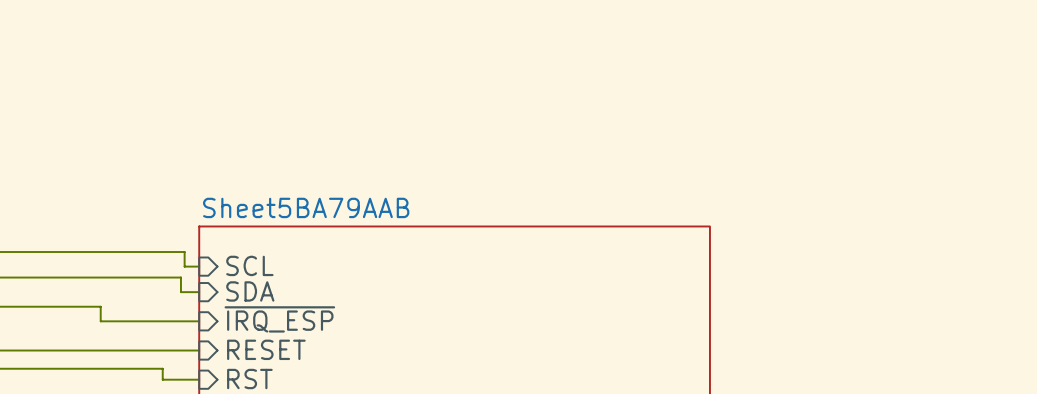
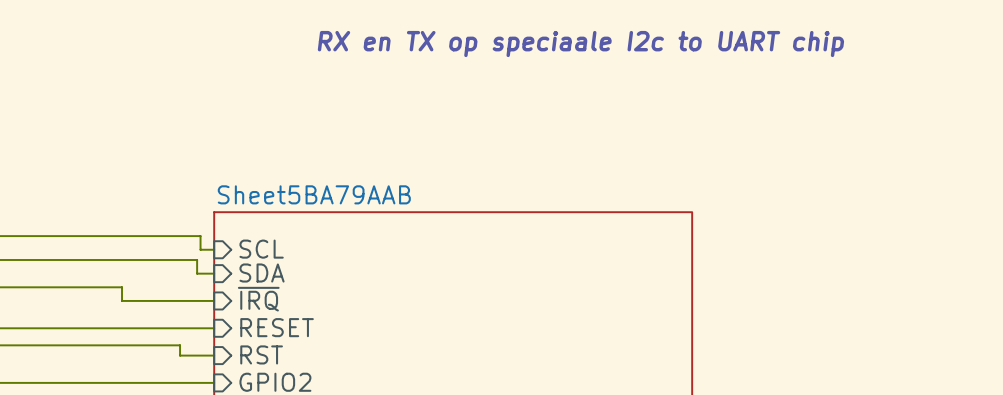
text: none -> RX en TX op speciaale I2c to UART chip (580, 44)
sheet pin: ~{IRQ_ESP} (279, 319) -> ~{IRQ} (258, 299)

